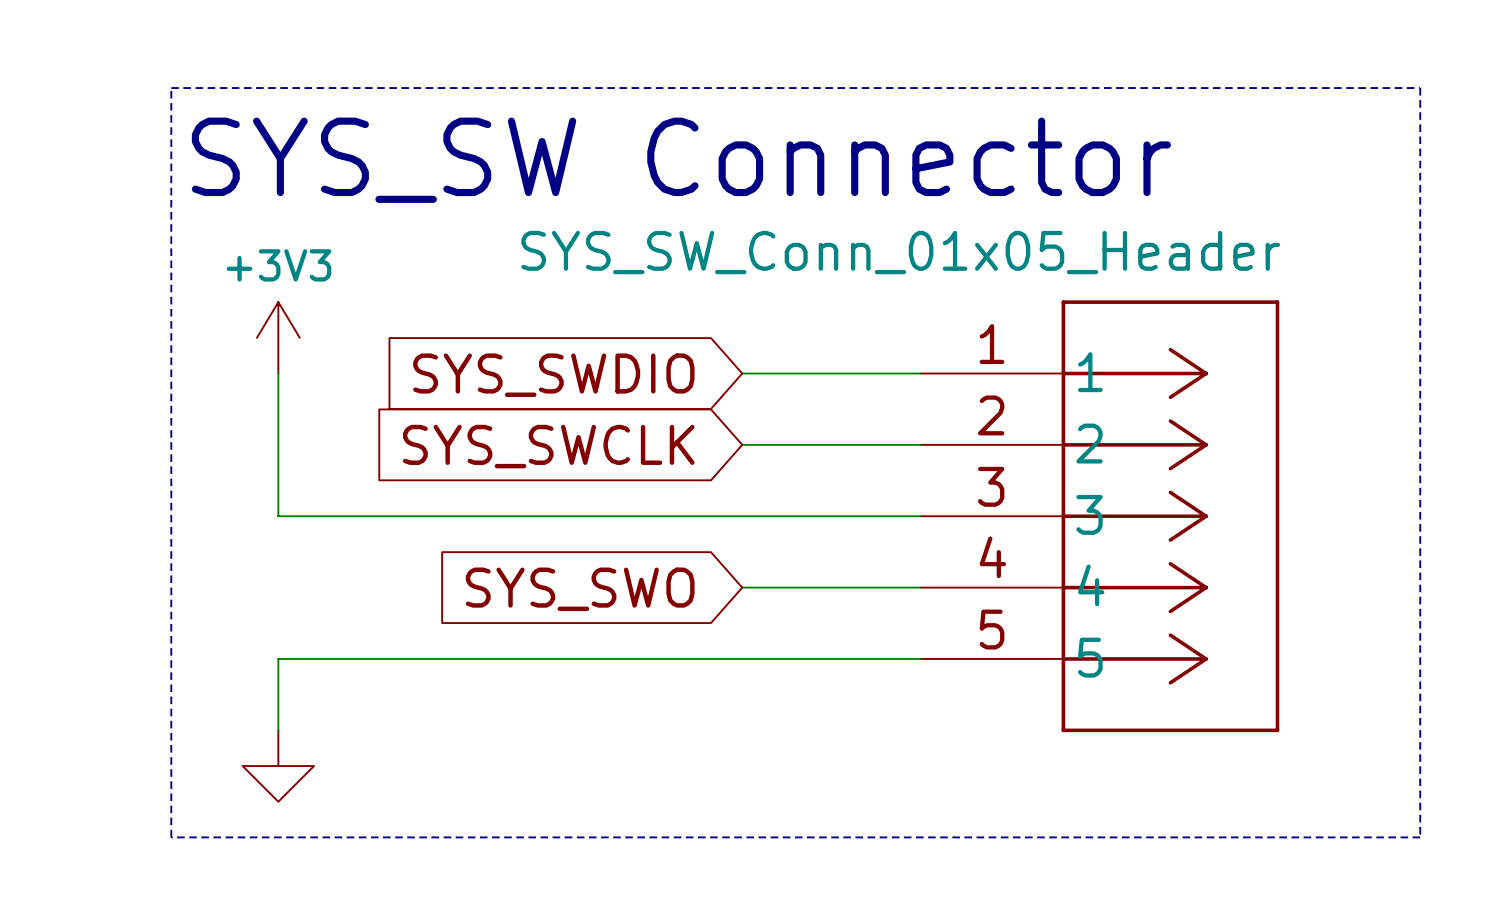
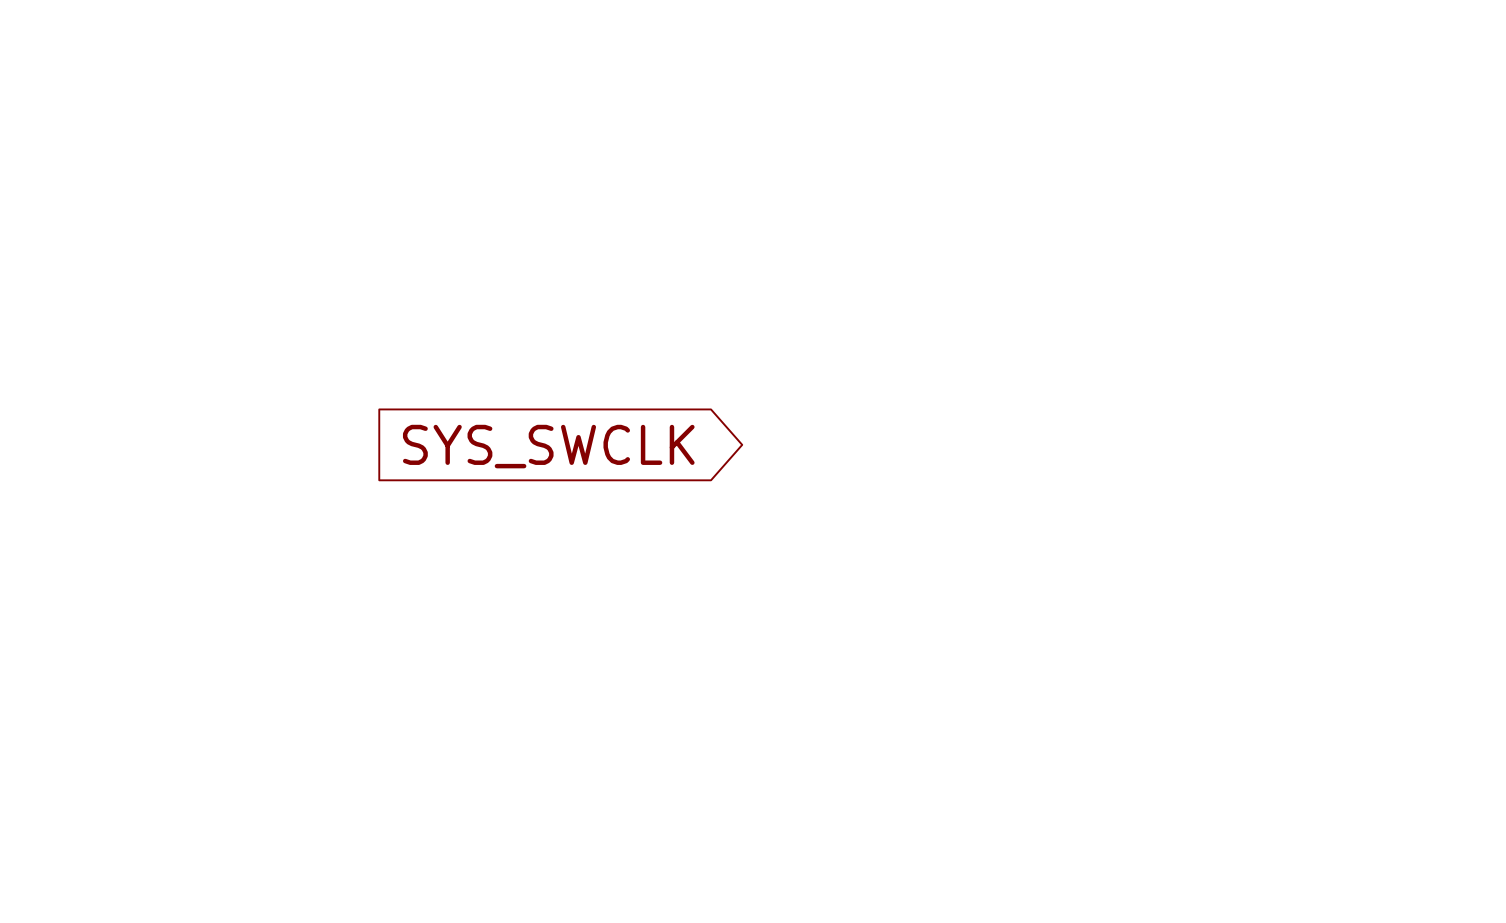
line: (171, 88) (1420, 88) (1420, 837) (171, 837) (171, 88) -> none
text: SYS_SW Connector (681, 160) -> none
power symbol: +3V3 (278, 337) -> none
wire: (278, 373) (278, 516) (920, 516) -> none
wire: (742, 373) (920, 373) -> none
global label: SYS_SWDIO (553, 375) -> none
wire: (742, 444) (920, 444) -> none
part: SYS_SW_Conn_01x05_Header (1099, 516) -> none
wire: (742, 587) (920, 587) -> none
global label: SYS_SWO (580, 589) -> none
wire: (920, 658) (278, 658) (278, 730) -> none
power symbol: (278, 766) -> none

